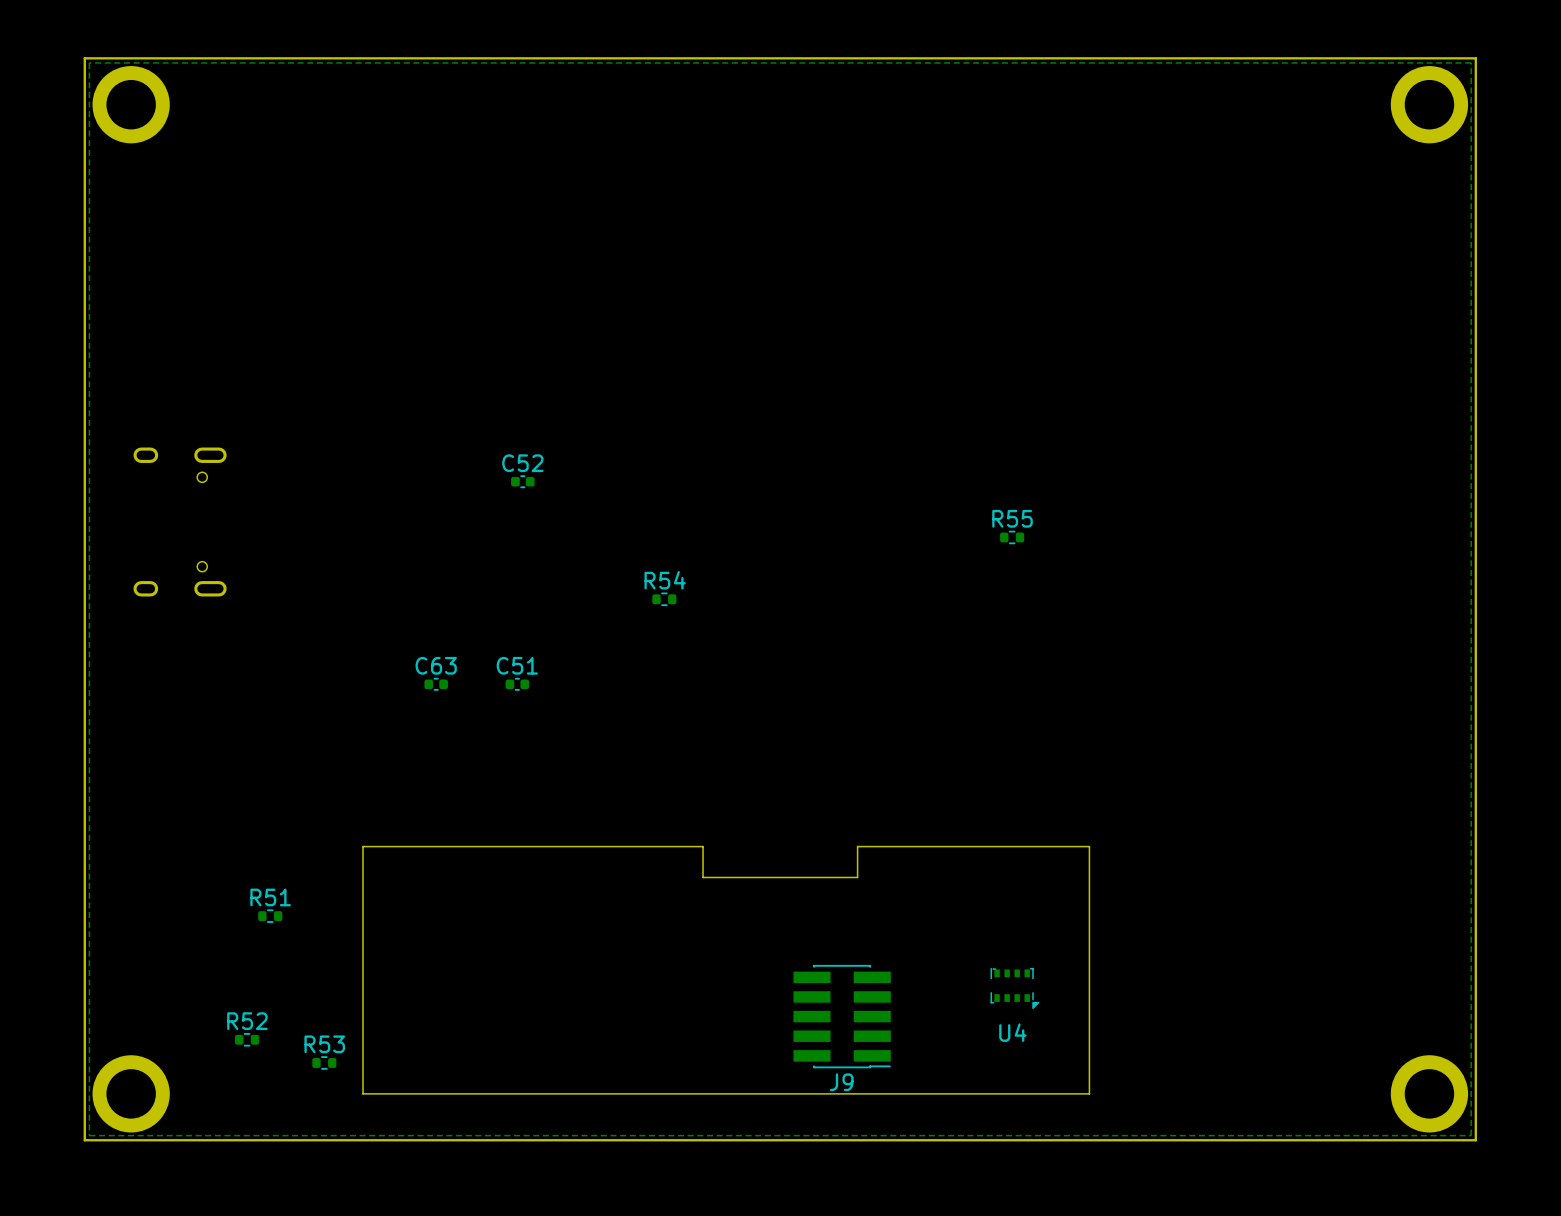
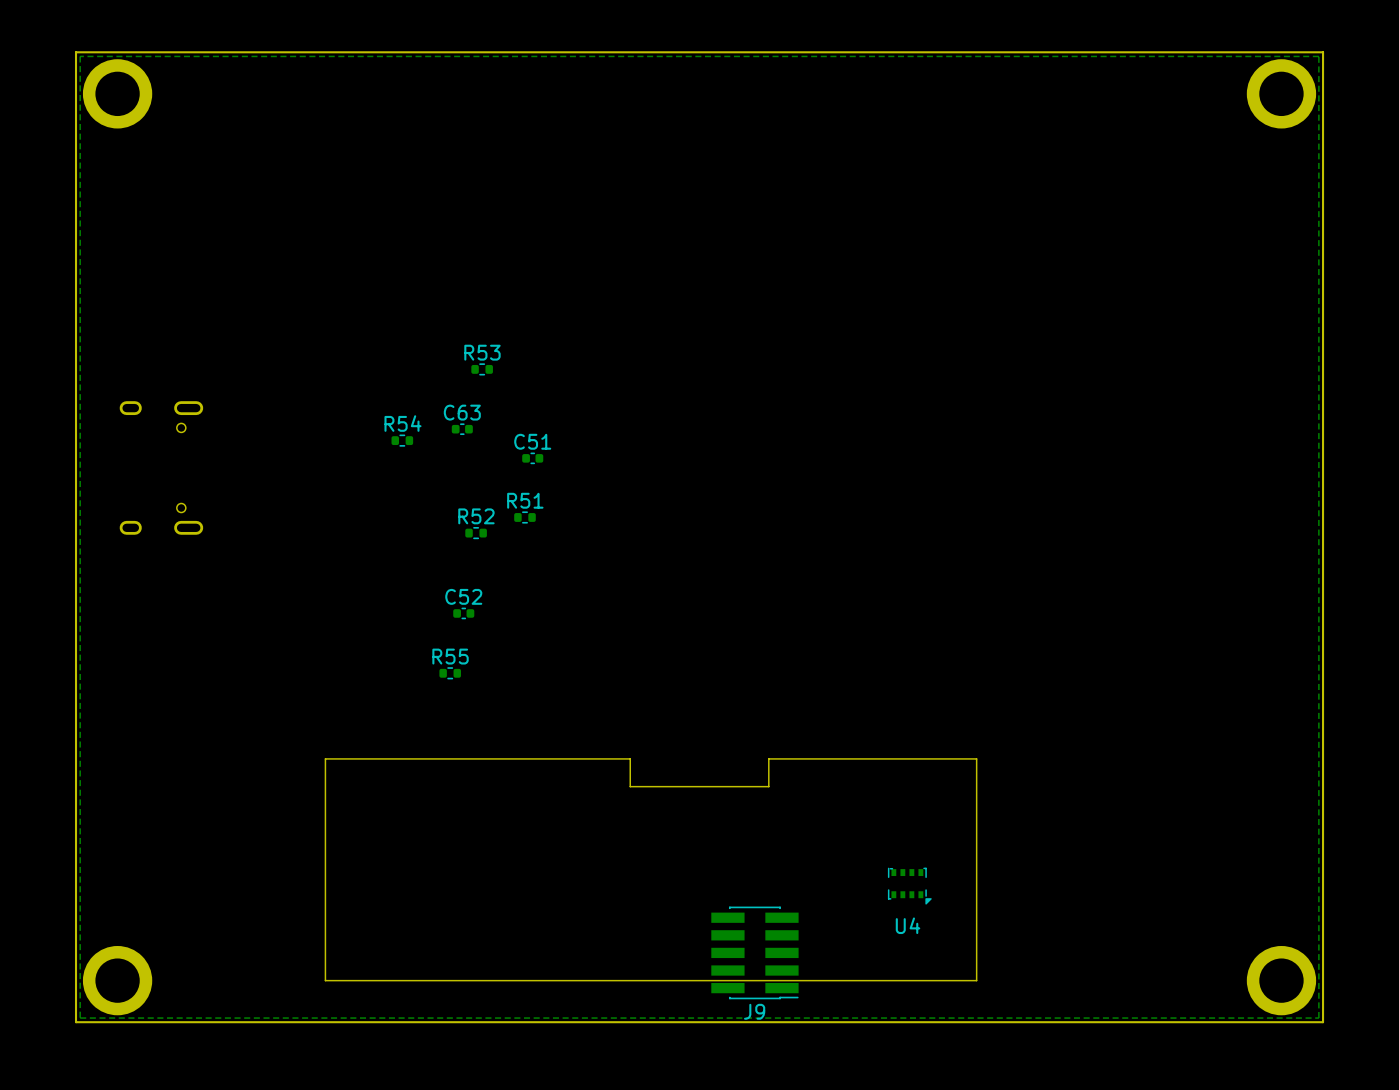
C52: (522, 481) -> none
C51: none -> (532, 458)
R55 position: (1012, 537) -> (450, 673)
R54 position: (664, 599) -> (402, 440)
C51 name: C51 (517, 665) -> C52 (463, 596)
C63 position: (436, 684) -> (462, 429)
R51 position: (270, 916) -> (524, 517)
J9 position: (842, 1016) -> (754, 952)
R52 position: (247, 1039) -> (476, 533)
R53 position: (324, 1062) -> (482, 369)

